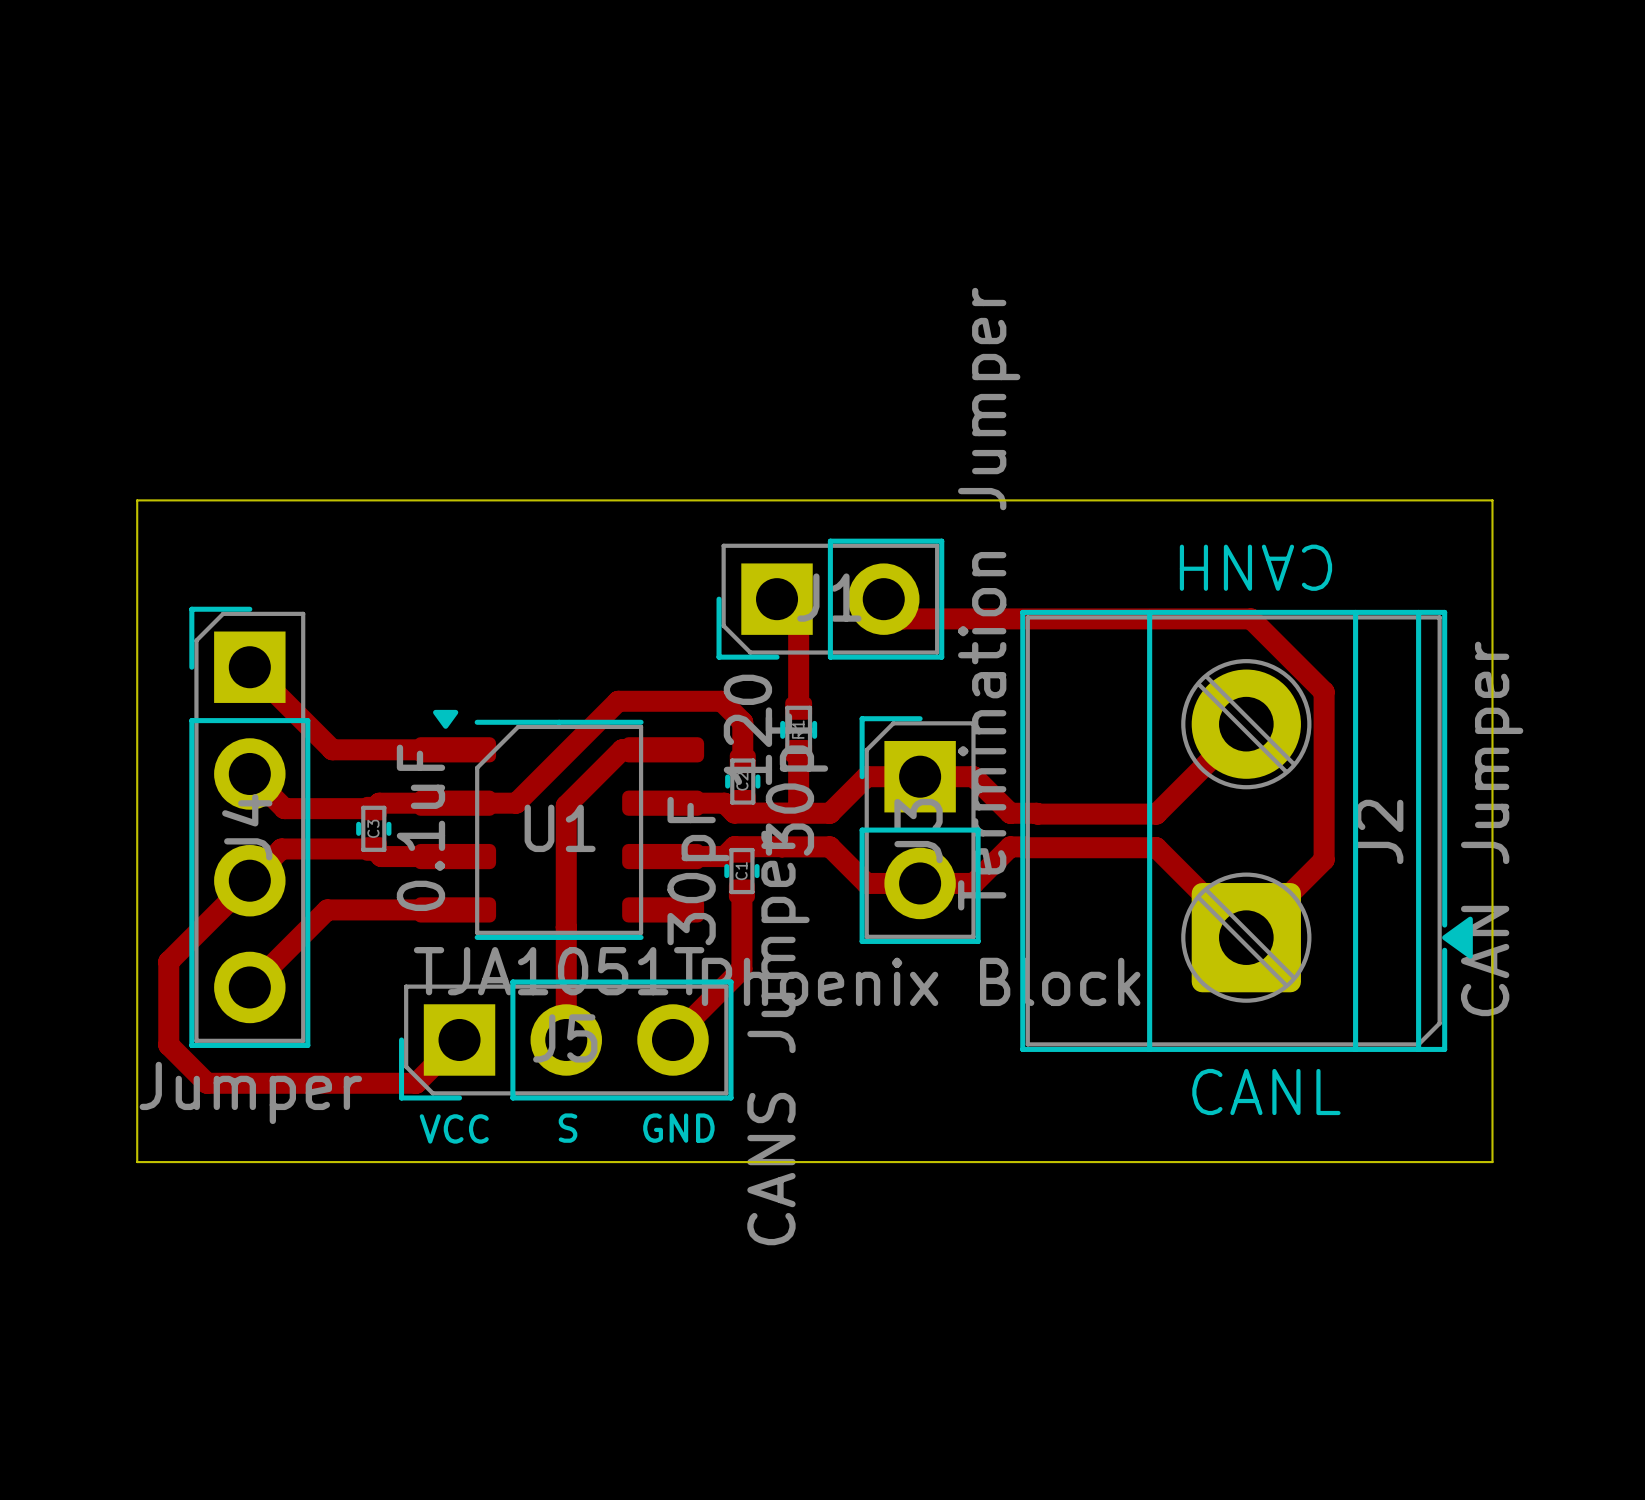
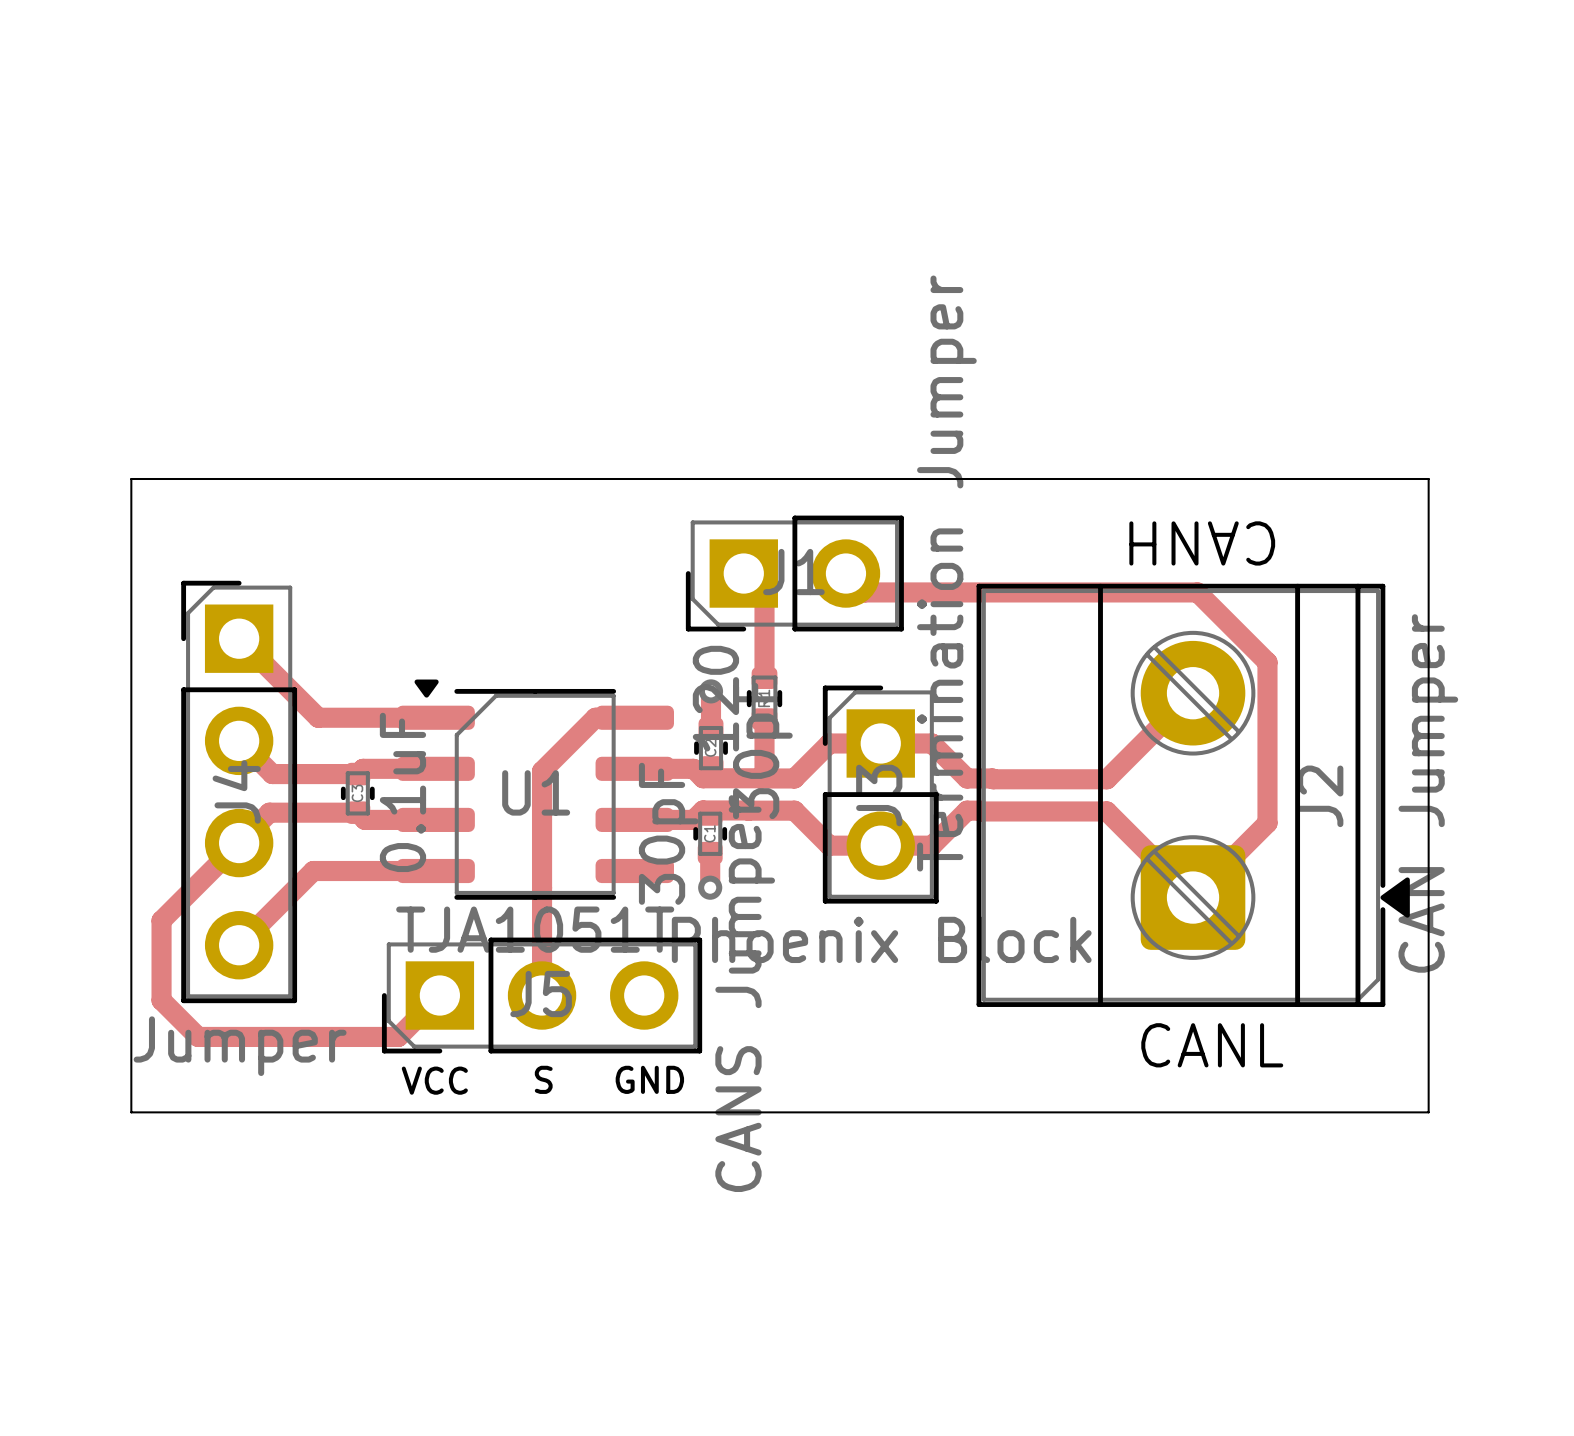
track: (742, 722) (721, 701) (618, 701) (516, 803) (455, 803) -> none
via: none -> (711, 691)
track: (741, 927) (741, 969) (664, 1046) -> none
via: none -> (710, 887)

